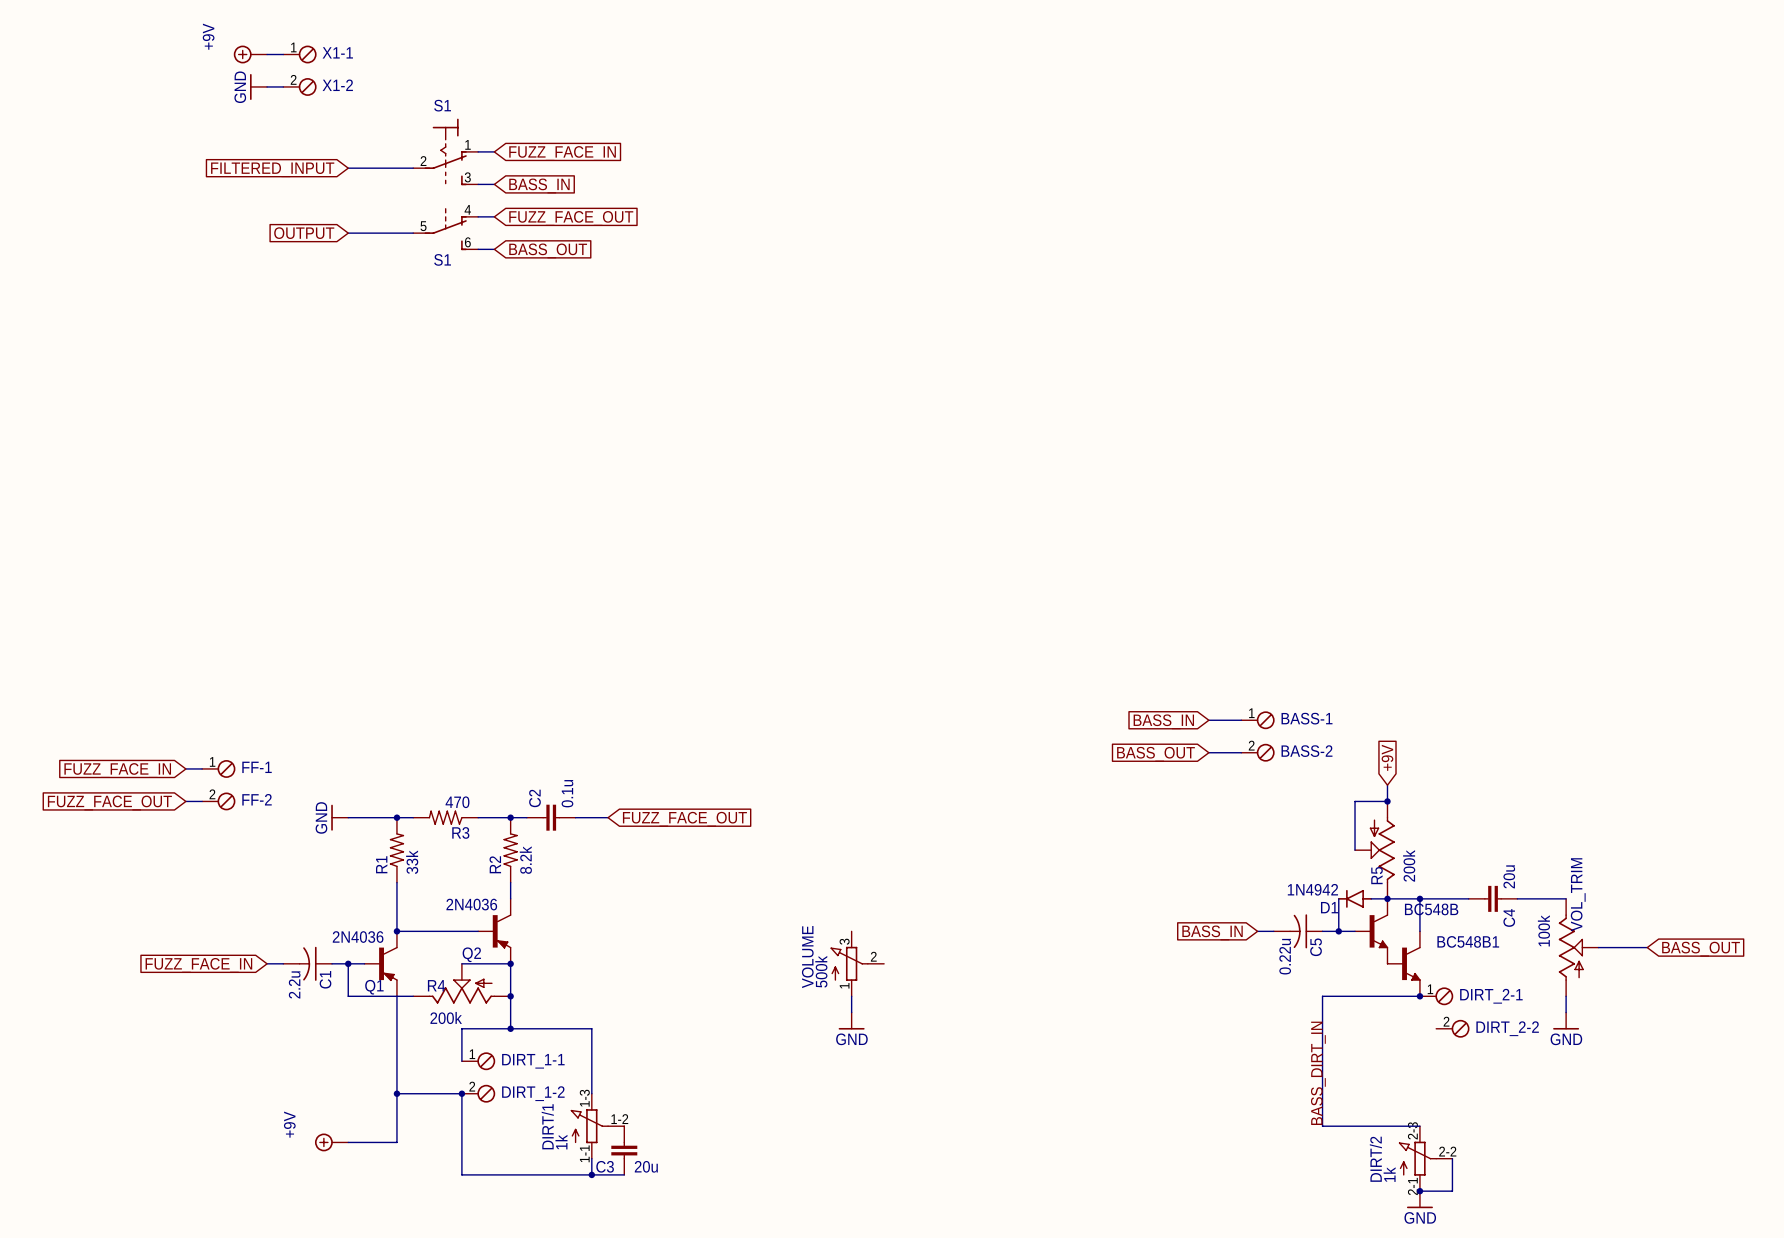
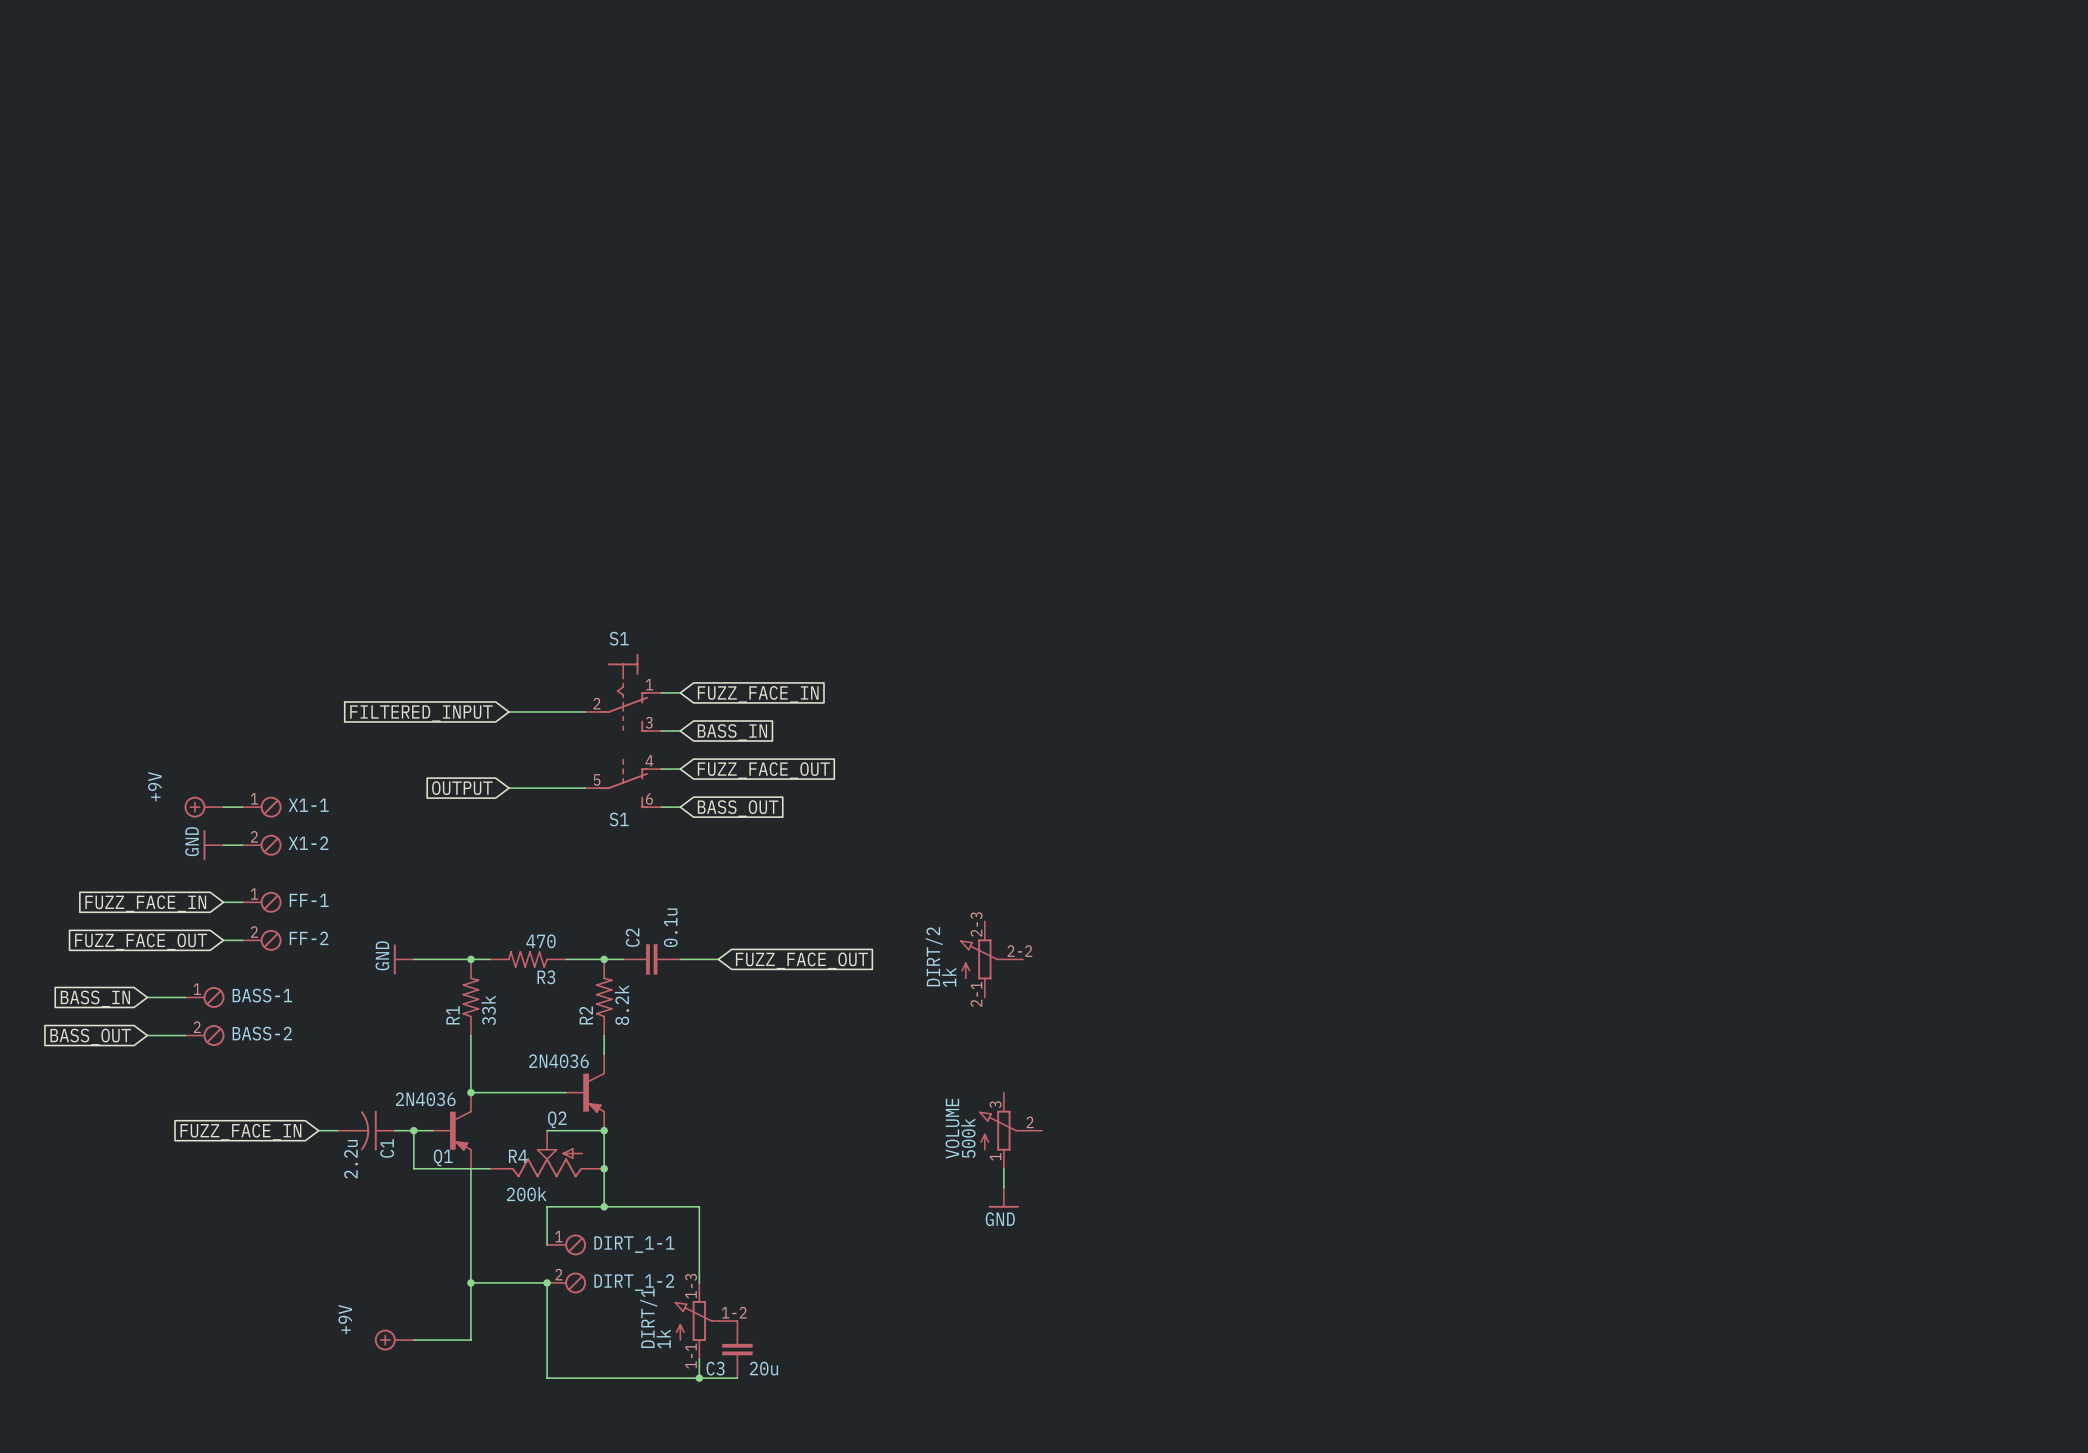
power symbol: +9V (250, 54) -> none
wire: (267, 54) (283, 54) -> none
X1-1 position: (299, 54) -> (262, 807)
power symbol: GND (258, 86) -> none
wire: (267, 86) (283, 86) -> none
X1-2 position: (299, 86) -> (262, 845)
S1: (445, 151) -> none
wire: (478, 151) (494, 151) -> none
global label: FUZZ_FACE_IN (562, 153) -> none
wire: (348, 168) (413, 168) -> none
global label: FILTERED_INPUT (272, 169) -> none
wire: (478, 184) (494, 184) -> none
global label: BASS_IN (539, 185) -> none
wire: (478, 216) (494, 216) -> none
global label: FUZZ_FACE_OUT (571, 218) -> none
S1: (445, 229) -> none
global label: OUTPUT (304, 233) -> none
wire: (348, 233) (413, 233) -> none
wire: (478, 249) (494, 249) -> none
global label: BASS_OUT (548, 250) -> none
S1: none -> (623, 692)
wire: none -> (661, 692) (680, 692)
global label: none -> FUZZ_FACE_IN (758, 694)
wire: none -> (509, 711) (585, 711)
global label: none -> FILTERED_INPUT (421, 713)
wire: none -> (661, 731) (680, 731)
global label: none -> BASS_IN (732, 732)
wire: none -> (661, 769) (680, 769)
global label: none -> FUZZ_FACE_OUT (763, 770)
S1: none -> (623, 783)
global label: none -> OUTPUT (462, 788)
wire: none -> (509, 788) (585, 788)
power symbol: none -> +9V (204, 807)
wire: none -> (223, 807) (242, 807)
wire: none -> (661, 807) (680, 807)
global label: none -> BASS_OUT (738, 808)
power symbol: none -> GND (213, 845)
wire: none -> (223, 845) (242, 845)
wire: (1208, 720) (1241, 720) -> none
BASS-1 position: (1257, 720) -> (204, 997)
global label: BASS_IN (1163, 721) -> none
wire: (1208, 752) (1241, 752) -> none
BASS-2 position: (1257, 752) -> (204, 1035)
global label: BASS_OUT (1156, 754) -> none
global label: +9V (1387, 757) -> none
wire: (1387, 785) (1387, 801) (1355, 801) (1355, 850) -> none
junction: (1387, 801) -> none
wire: none -> (147, 997) (185, 997)
R5: 200k (1374, 850) -> none
global label: none -> BASS_IN (95, 998)
wire: none -> (147, 1035) (185, 1035)
global label: none -> BASS_OUT (90, 1037)
wire: (1338, 898) (1338, 931) -> none
D1: 1N4942 (1355, 898) -> none
wire: (1371, 898) (1468, 898) -> none
junction: (1387, 898) -> none
wire: (1419, 898) (1419, 931) -> none
junction: (1419, 898) -> none
C4: 20u (1493, 898) -> none
wire: (1517, 898) (1566, 898) -> none
wire: (1257, 931) (1273, 931) -> none
C5: 0.22u (1298, 931) -> none
wire: (1322, 931) (1355, 931) -> none
junction: (1338, 931) -> none
BC548B: (1371, 931) -> none
global label: BASS_IN (1212, 932) -> none
VOL_TRIM: 100k (1578, 947) -> none
wire: (1598, 947) (1647, 947) -> none
global label: BASS_OUT (1701, 949) -> none
BC548B1: (1403, 963) -> none
wire: (1419, 996) (1322, 996) (1322, 1126) (1419, 1126) -> none
junction: (1419, 996) -> none
DIRT_2-1: (1436, 996) -> none
wire: (1566, 996) (1566, 1012) -> none
power symbol: GND (1566, 1021) -> none
DIRT_2-2: (1452, 1028) -> none
label: BASS_DIRT_IN (1318, 1073) -> none
DIRT/2 position: (1425, 1158) -> (991, 959)
wire: (1452, 1158) (1452, 1191) (1419, 1191) -> none
junction: (1419, 1191) -> none
power symbol: GND (1419, 1199) -> none

